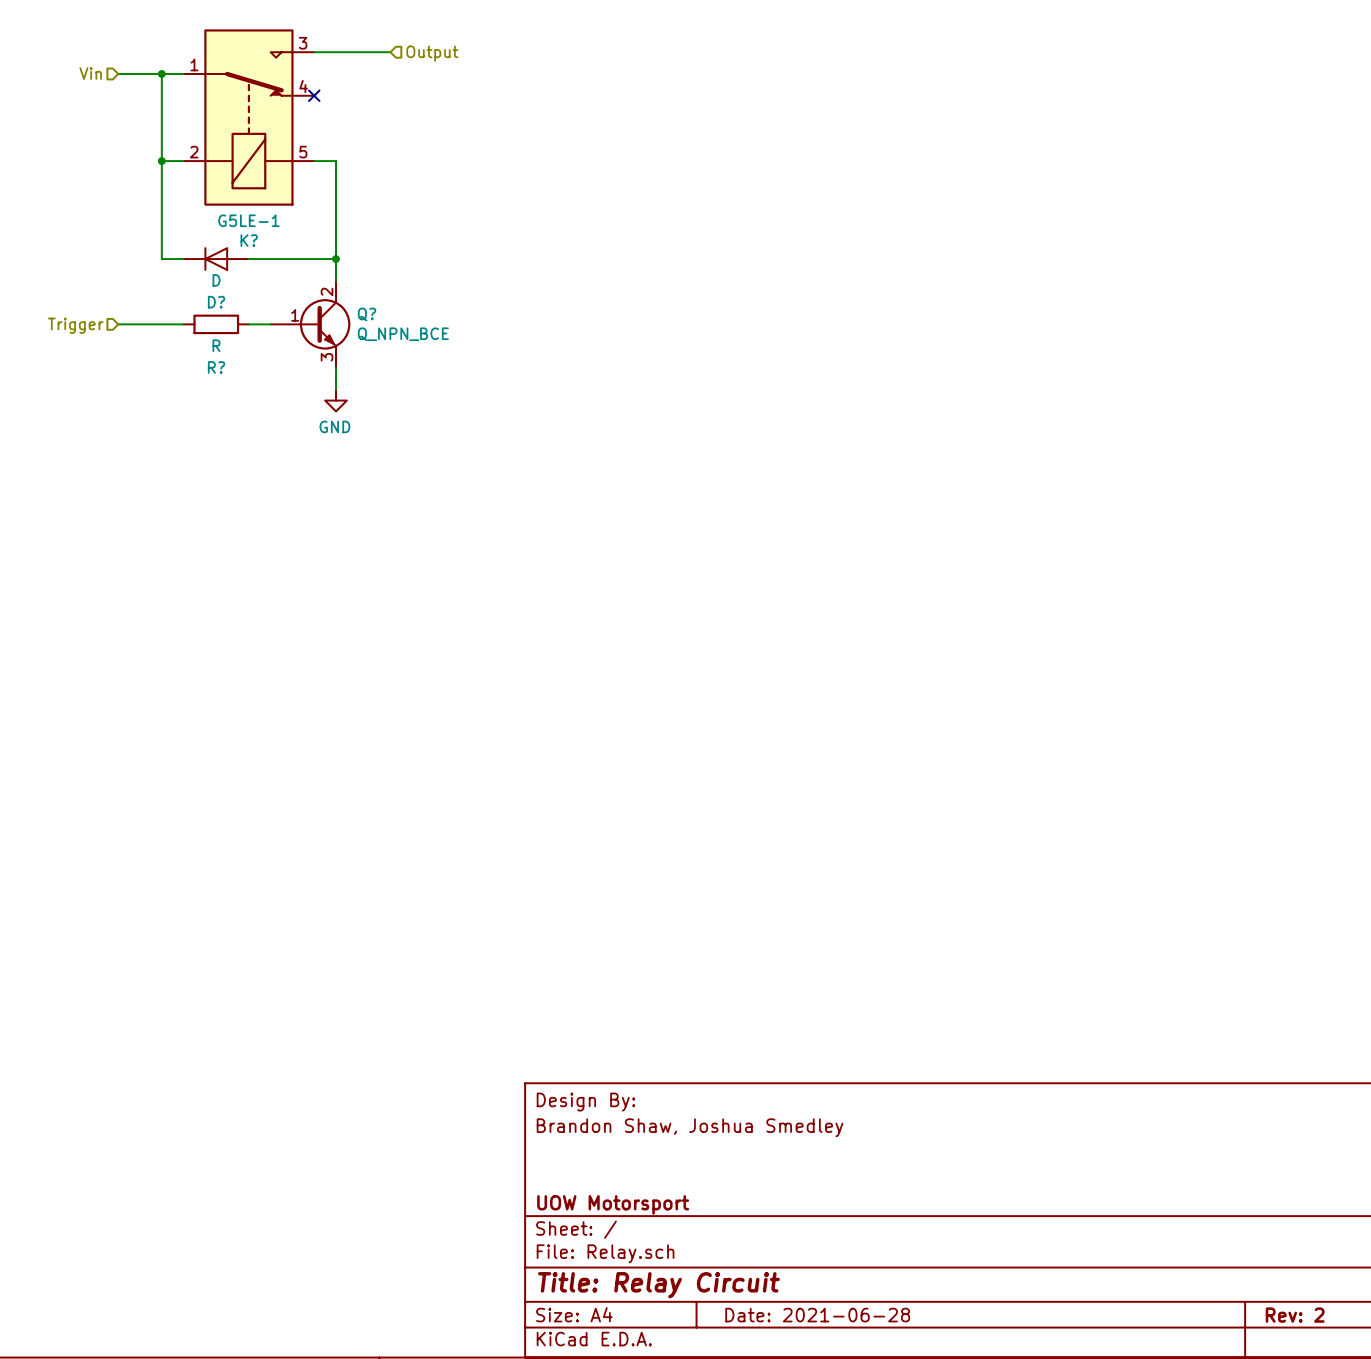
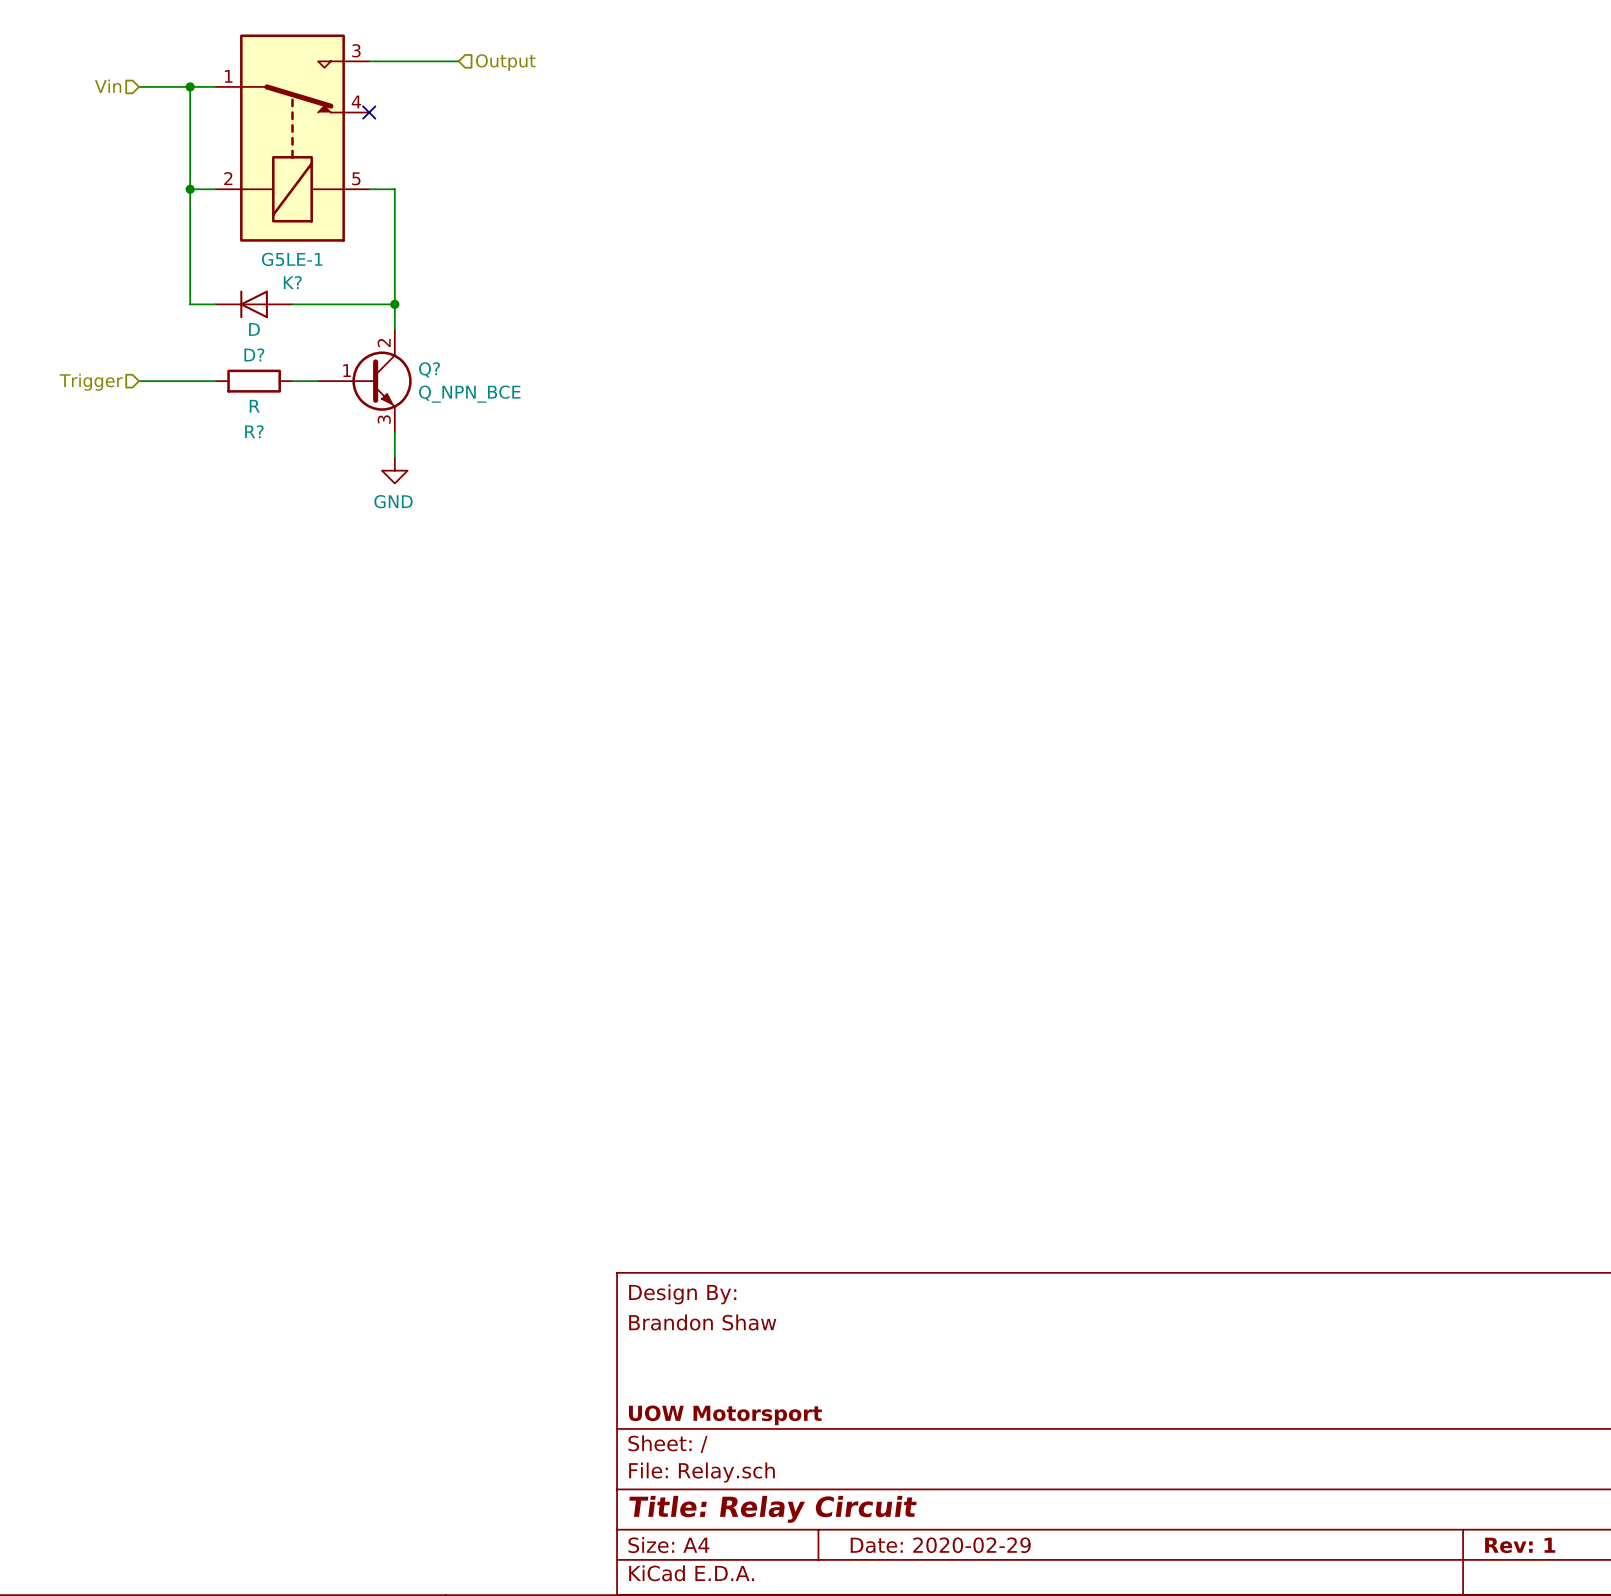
title block: Brandon Shaw, Joshua Smedley (690, 1127) -> Brandon Shaw (702, 1322)
title block: Date: 2021-06-28 (817, 1315) -> Date: 2020-02-29 (940, 1545)
title block: Rev: 2 (1295, 1315) -> Rev: 1 (1520, 1545)

